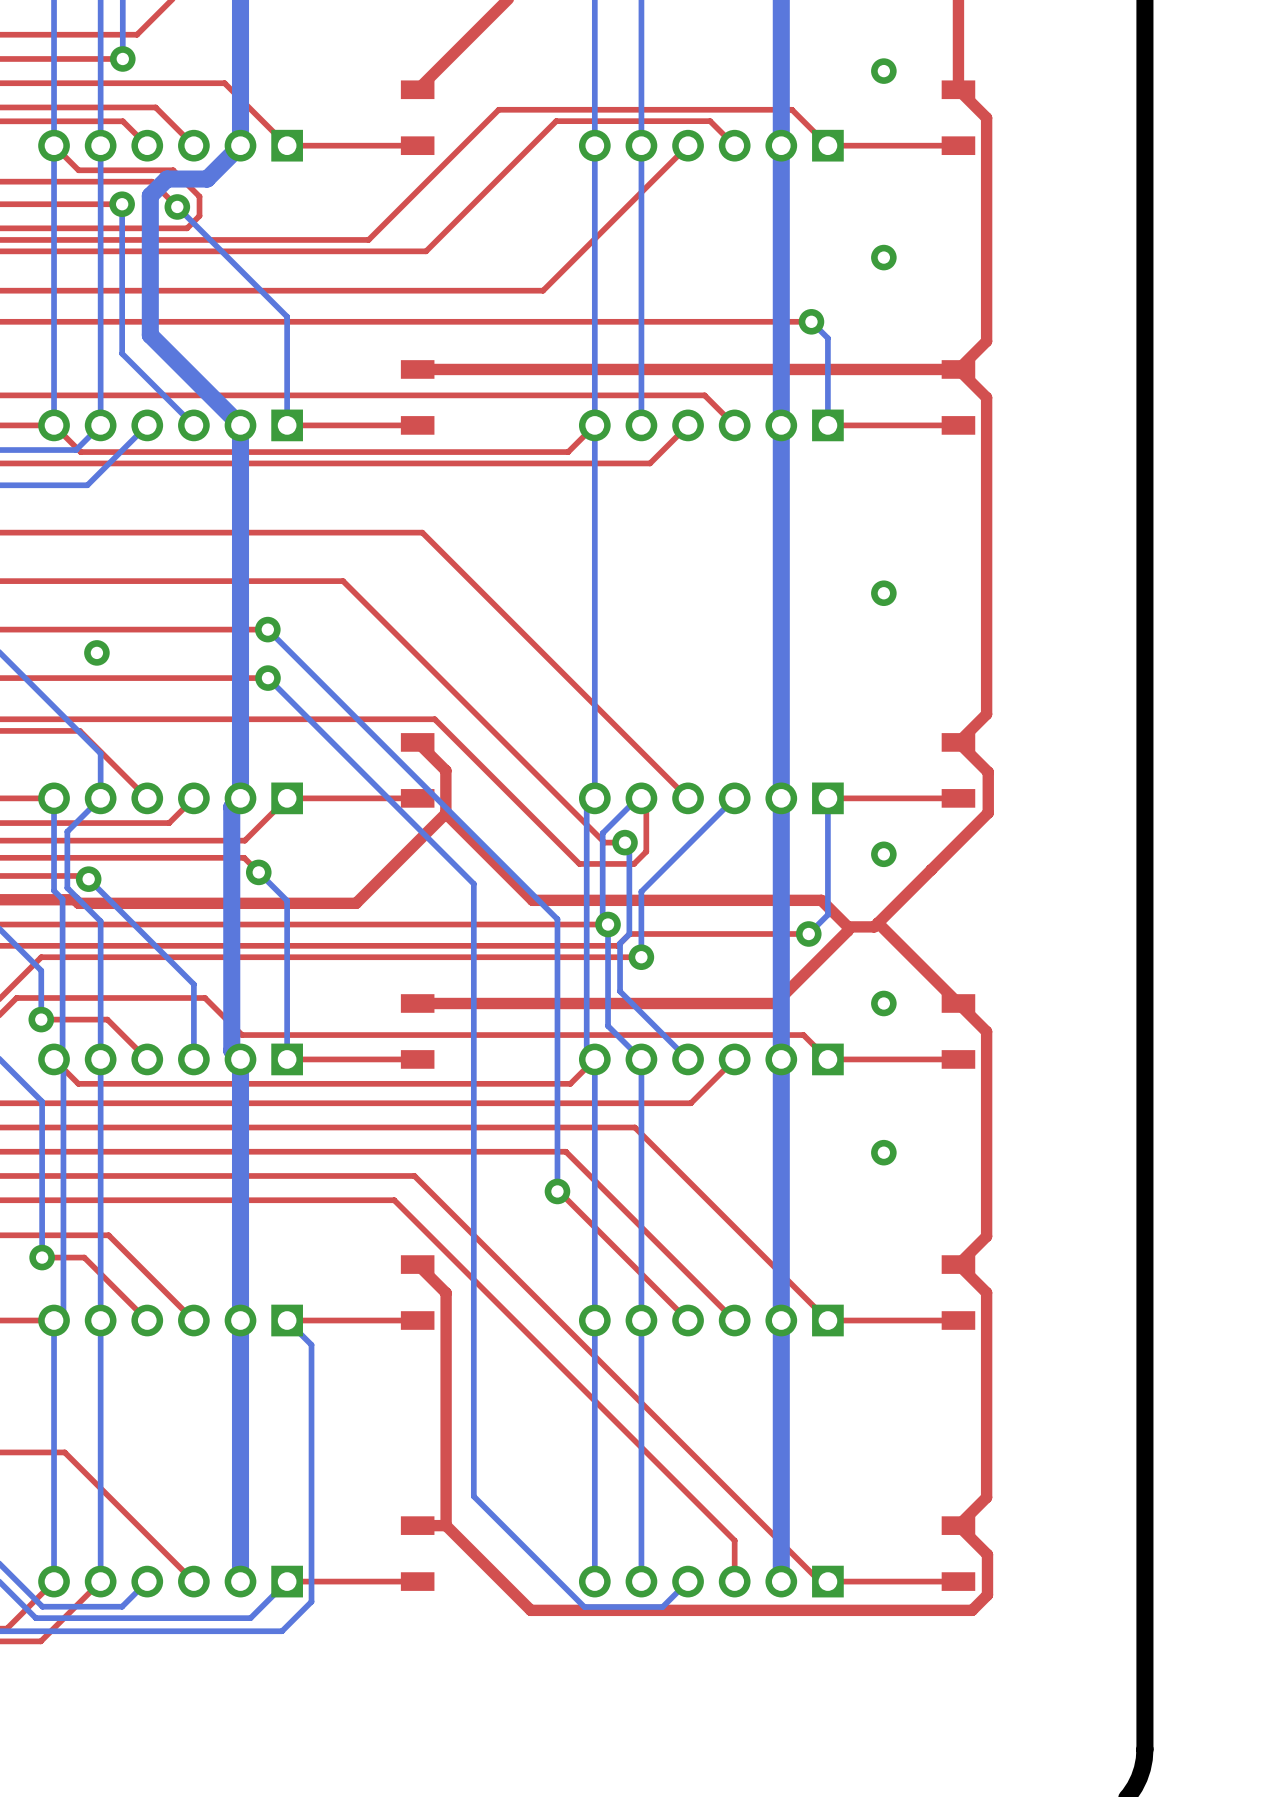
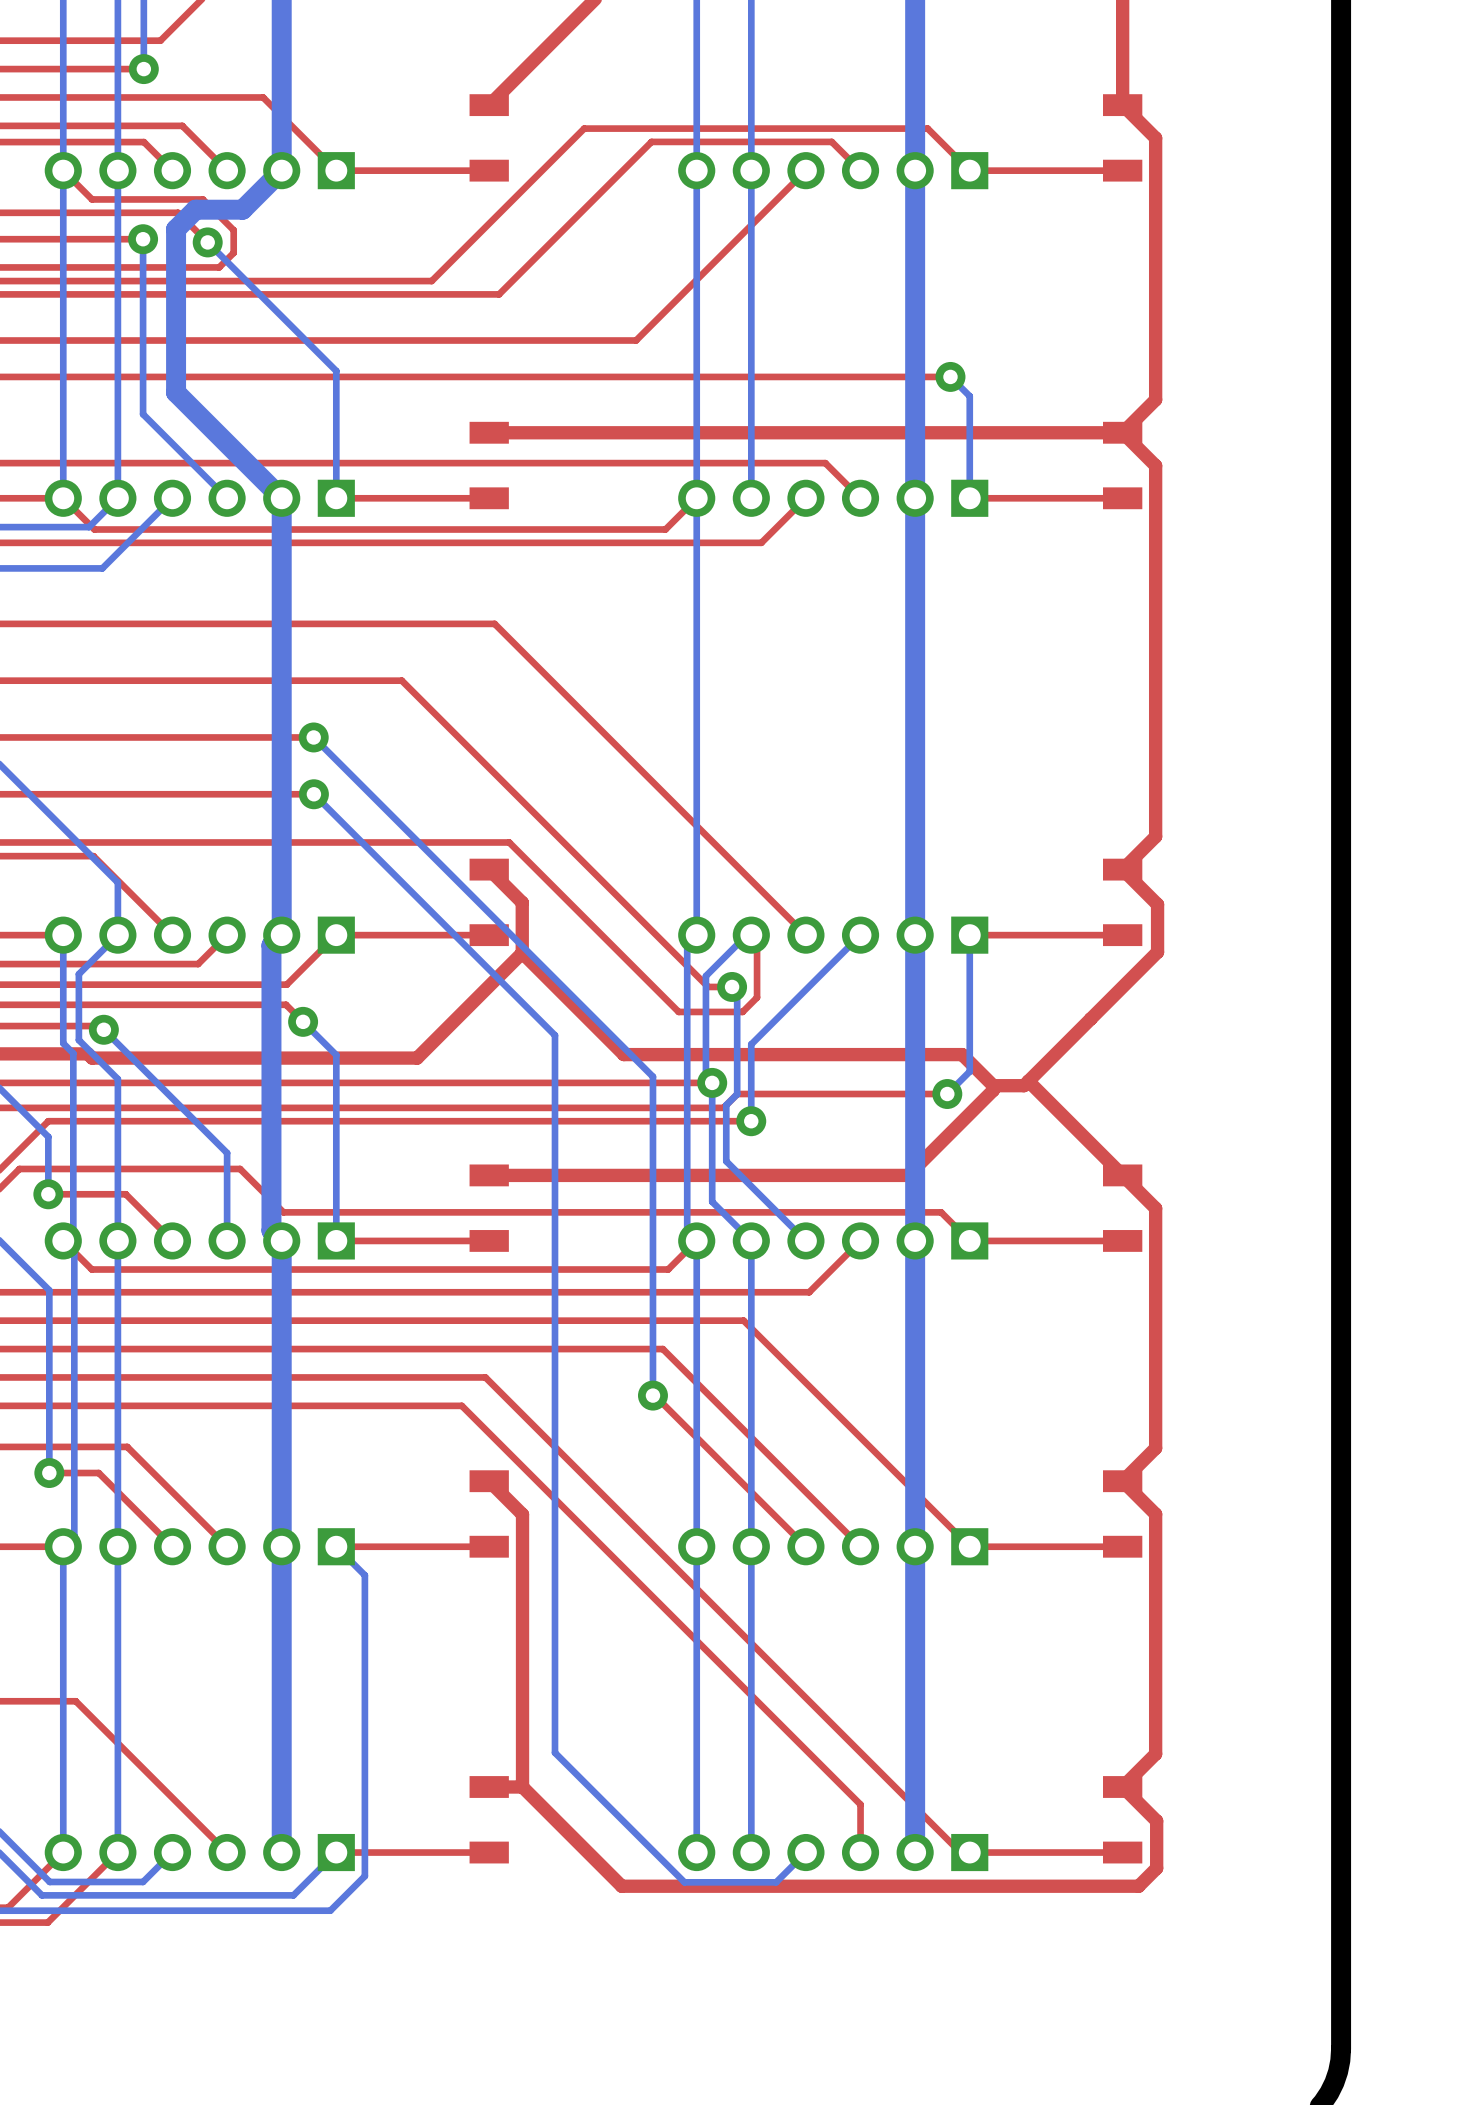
part: (883, 71) -> none
part: (883, 257) -> none
part: (883, 593) -> none
part: (96, 652) -> none
part: (883, 854) -> none
part: (883, 1003) -> none
part: (883, 1152) -> none

